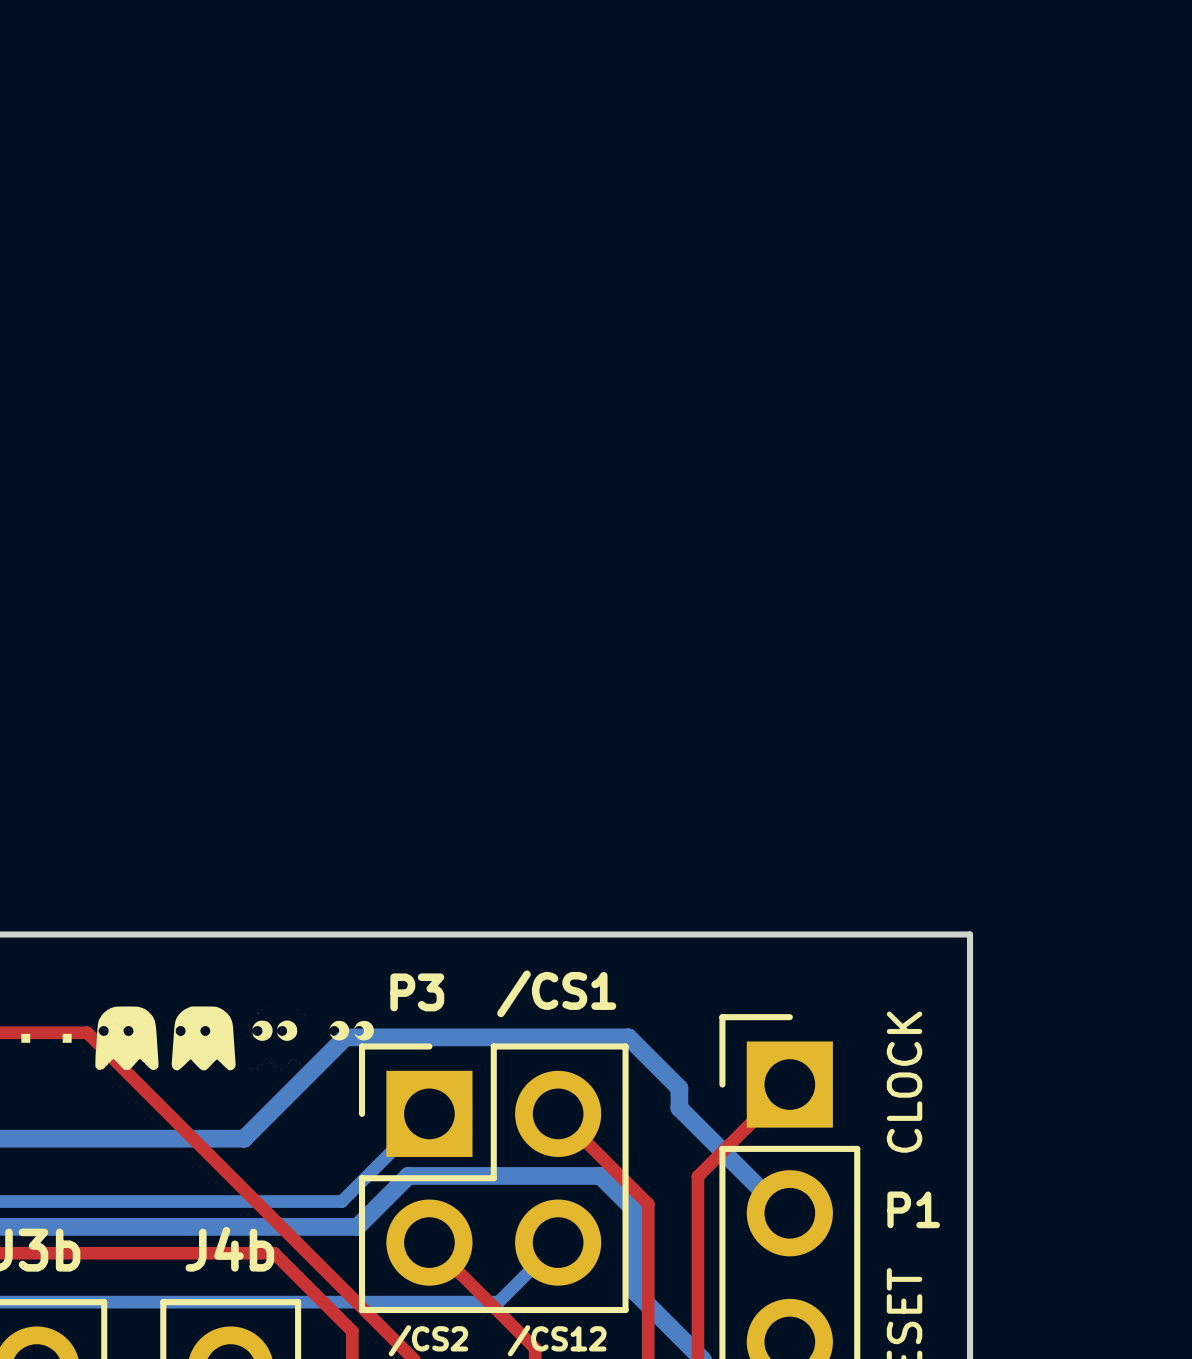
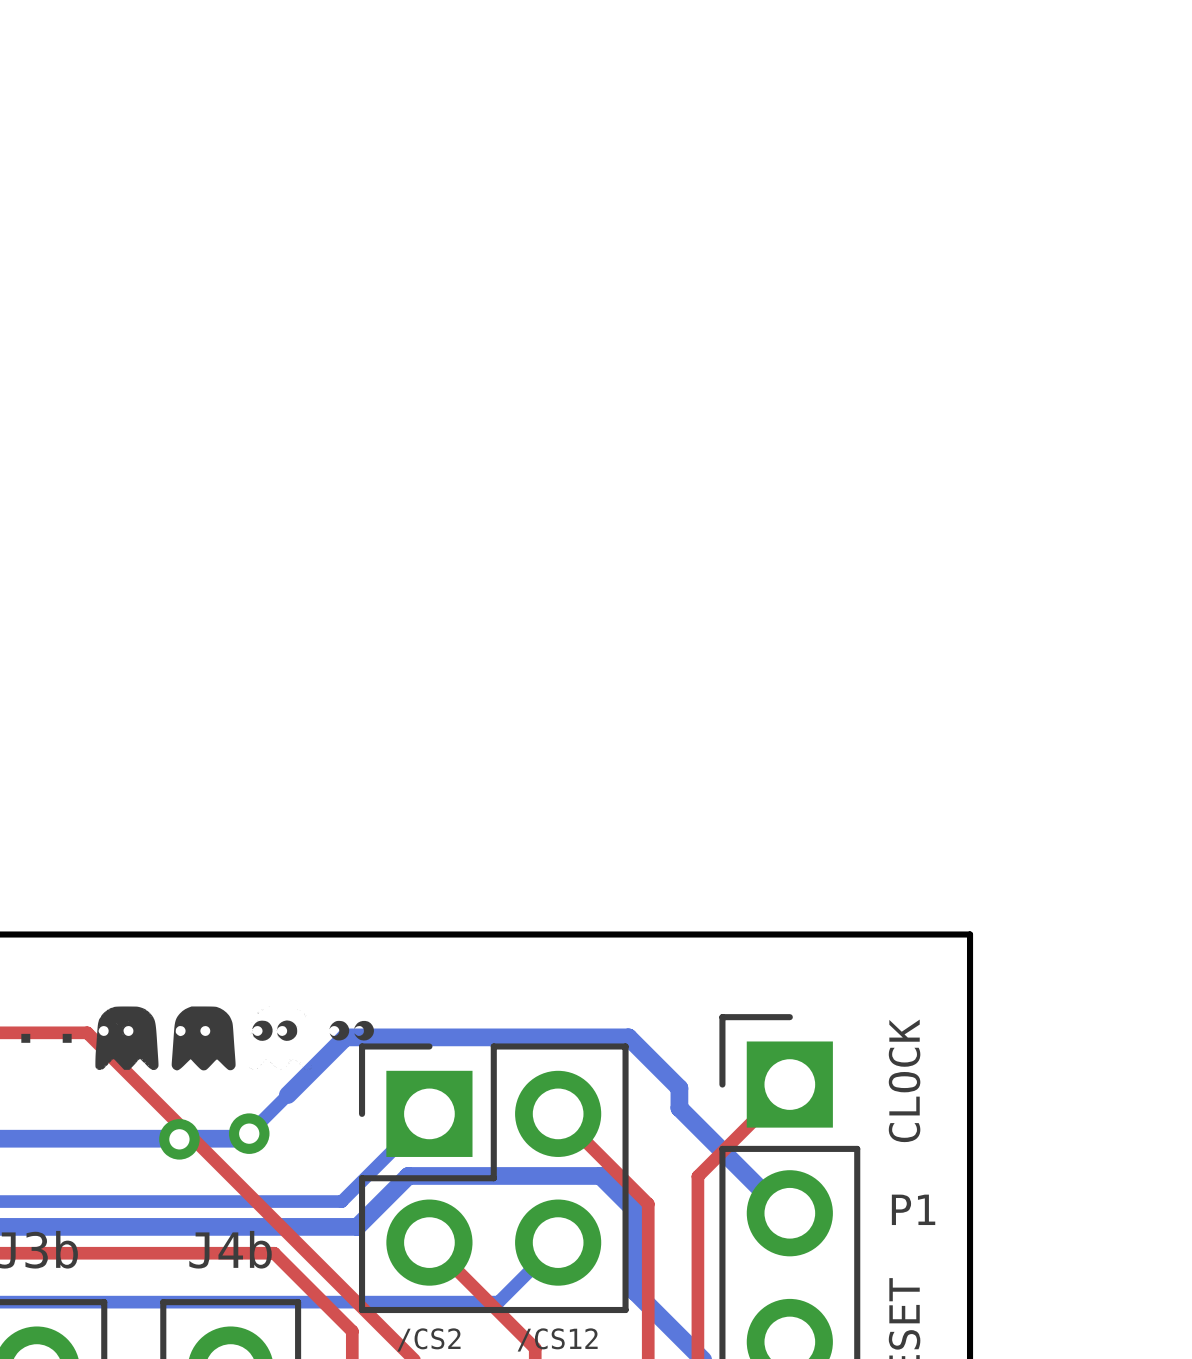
text: P3 (417, 992) -> none
text: /CS1 (556, 993) -> none
bottom track width: thick (287, 1095) (249, 1133) -> thin (287, 1095) (249, 1133)
via: none -> (249, 1133)
via: none -> (179, 1139)

